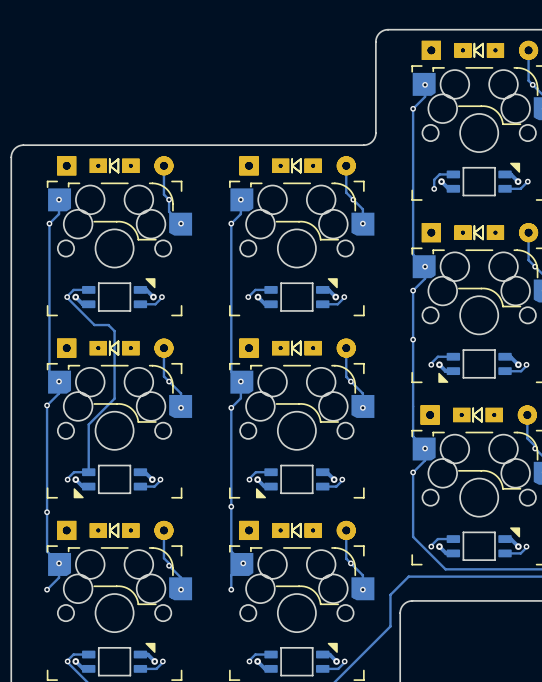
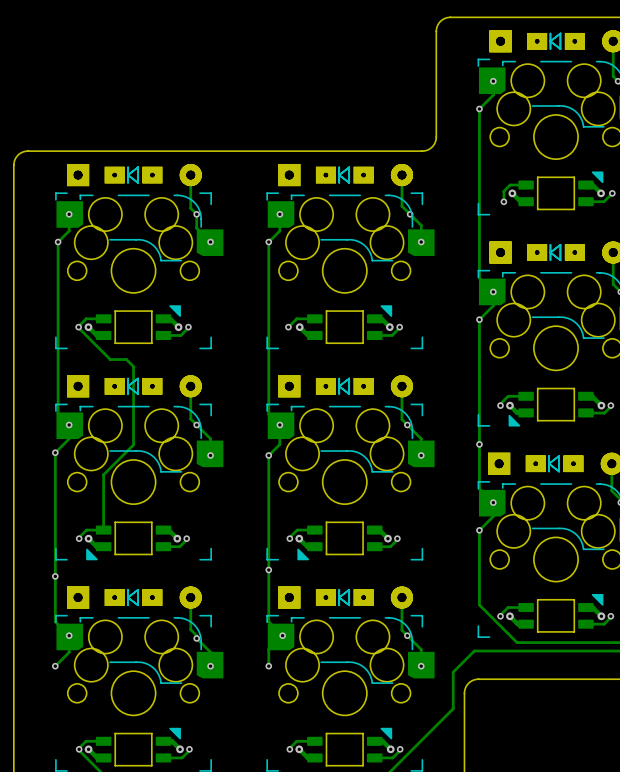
via: (413, 339) -> none
via: none -> (479, 444)

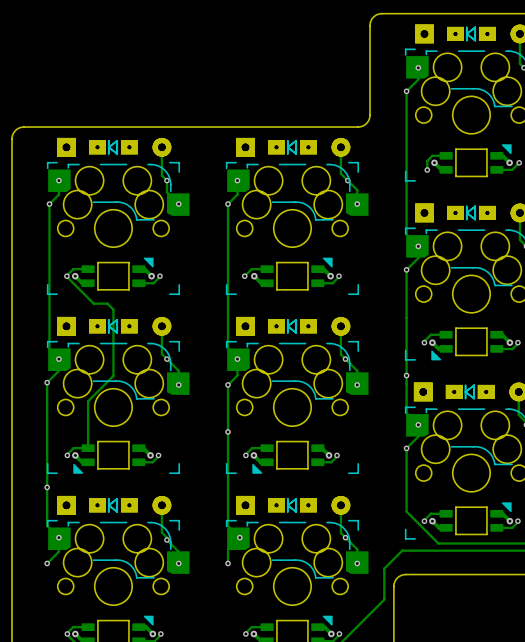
via position: (268, 569) -> (228, 431)

